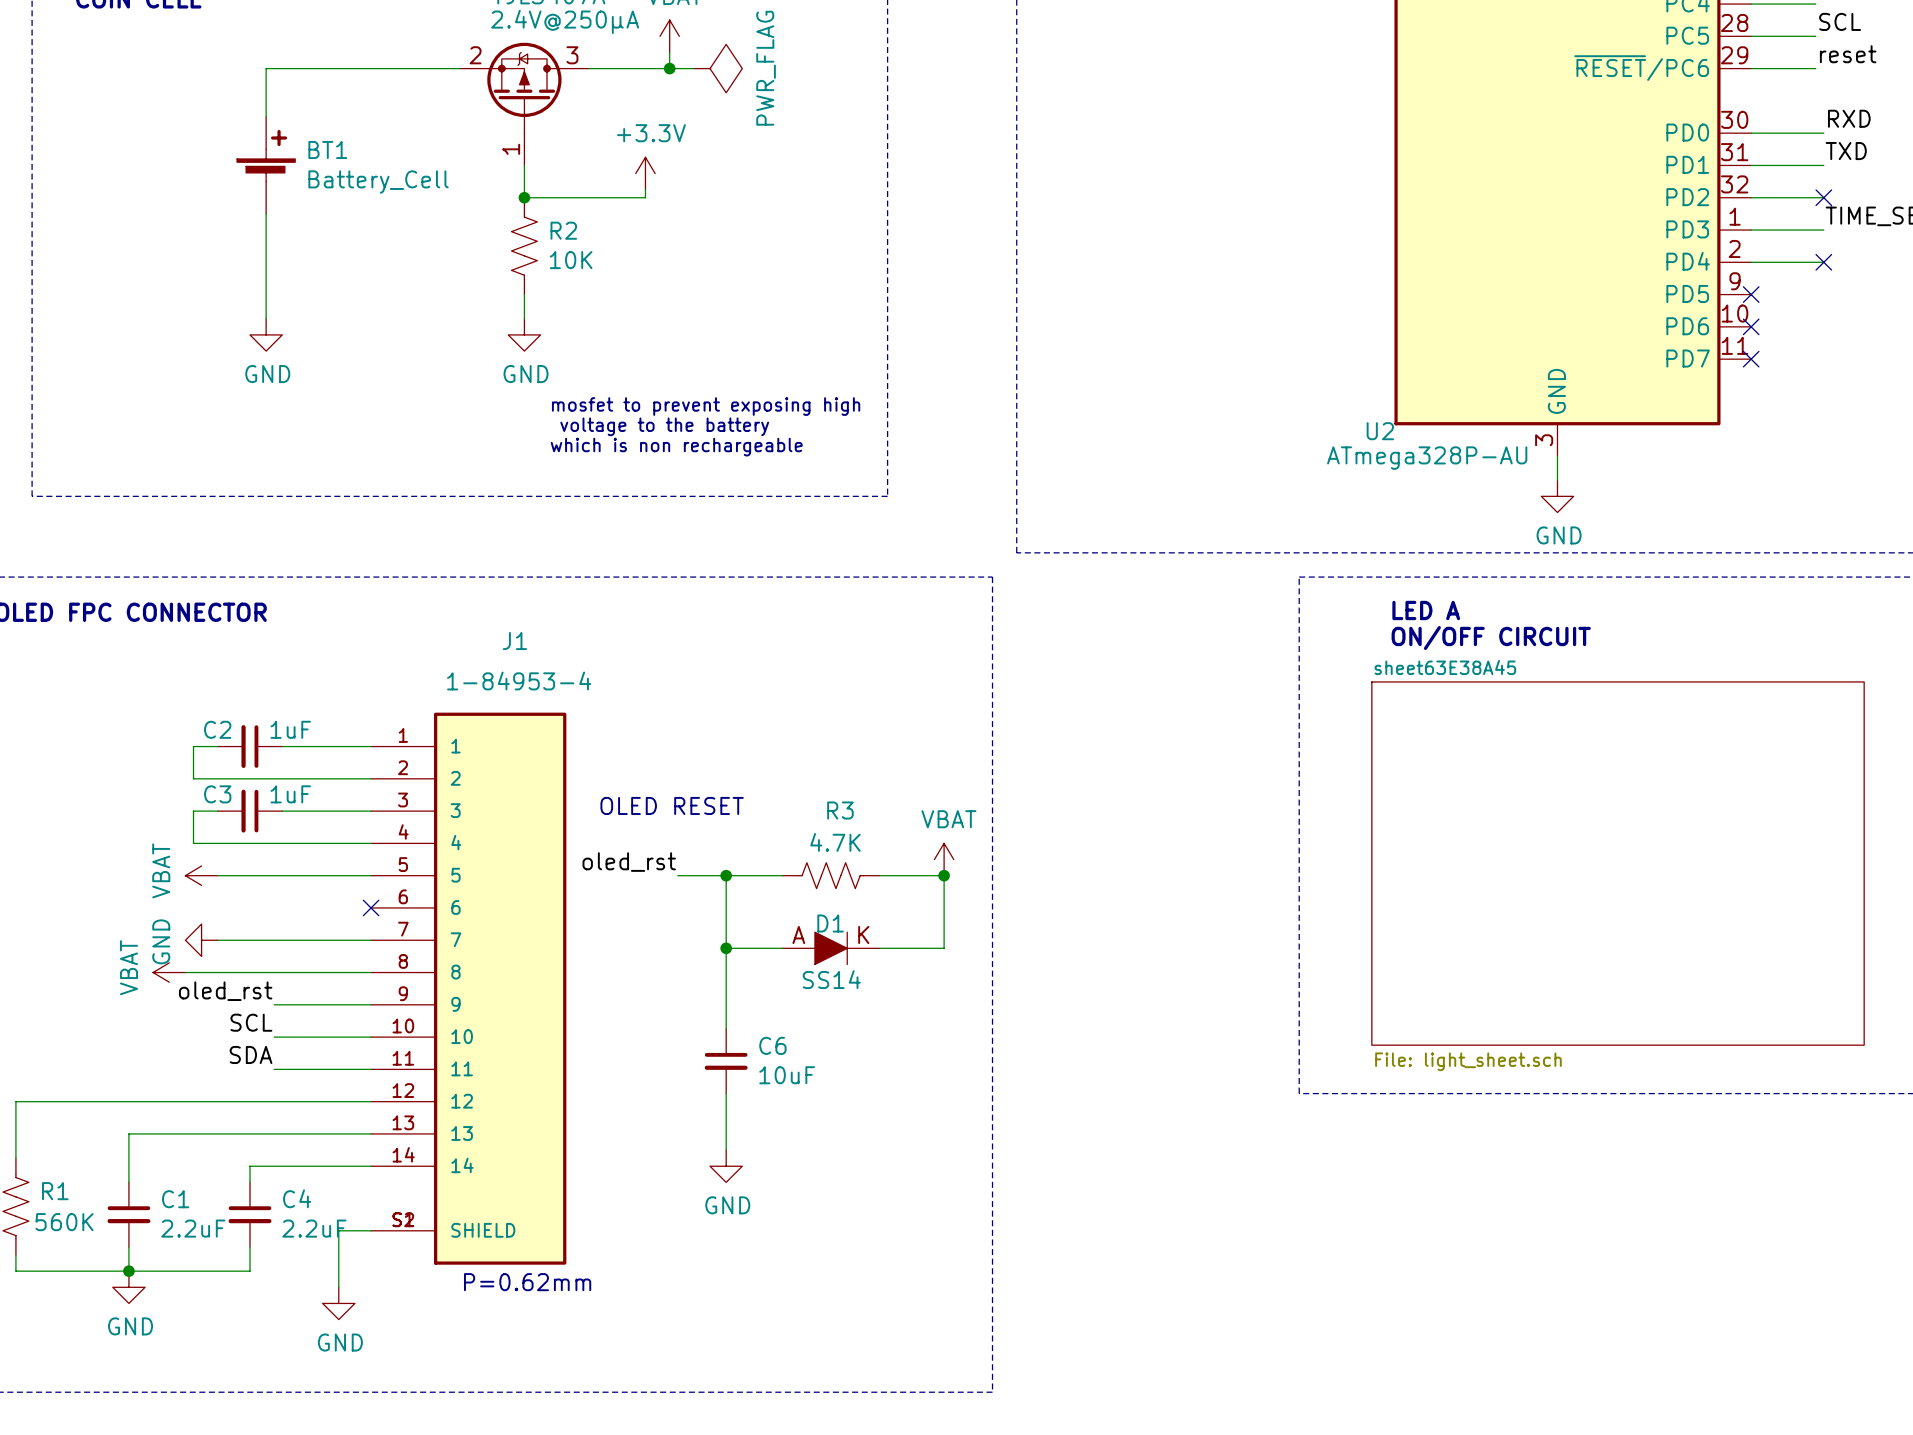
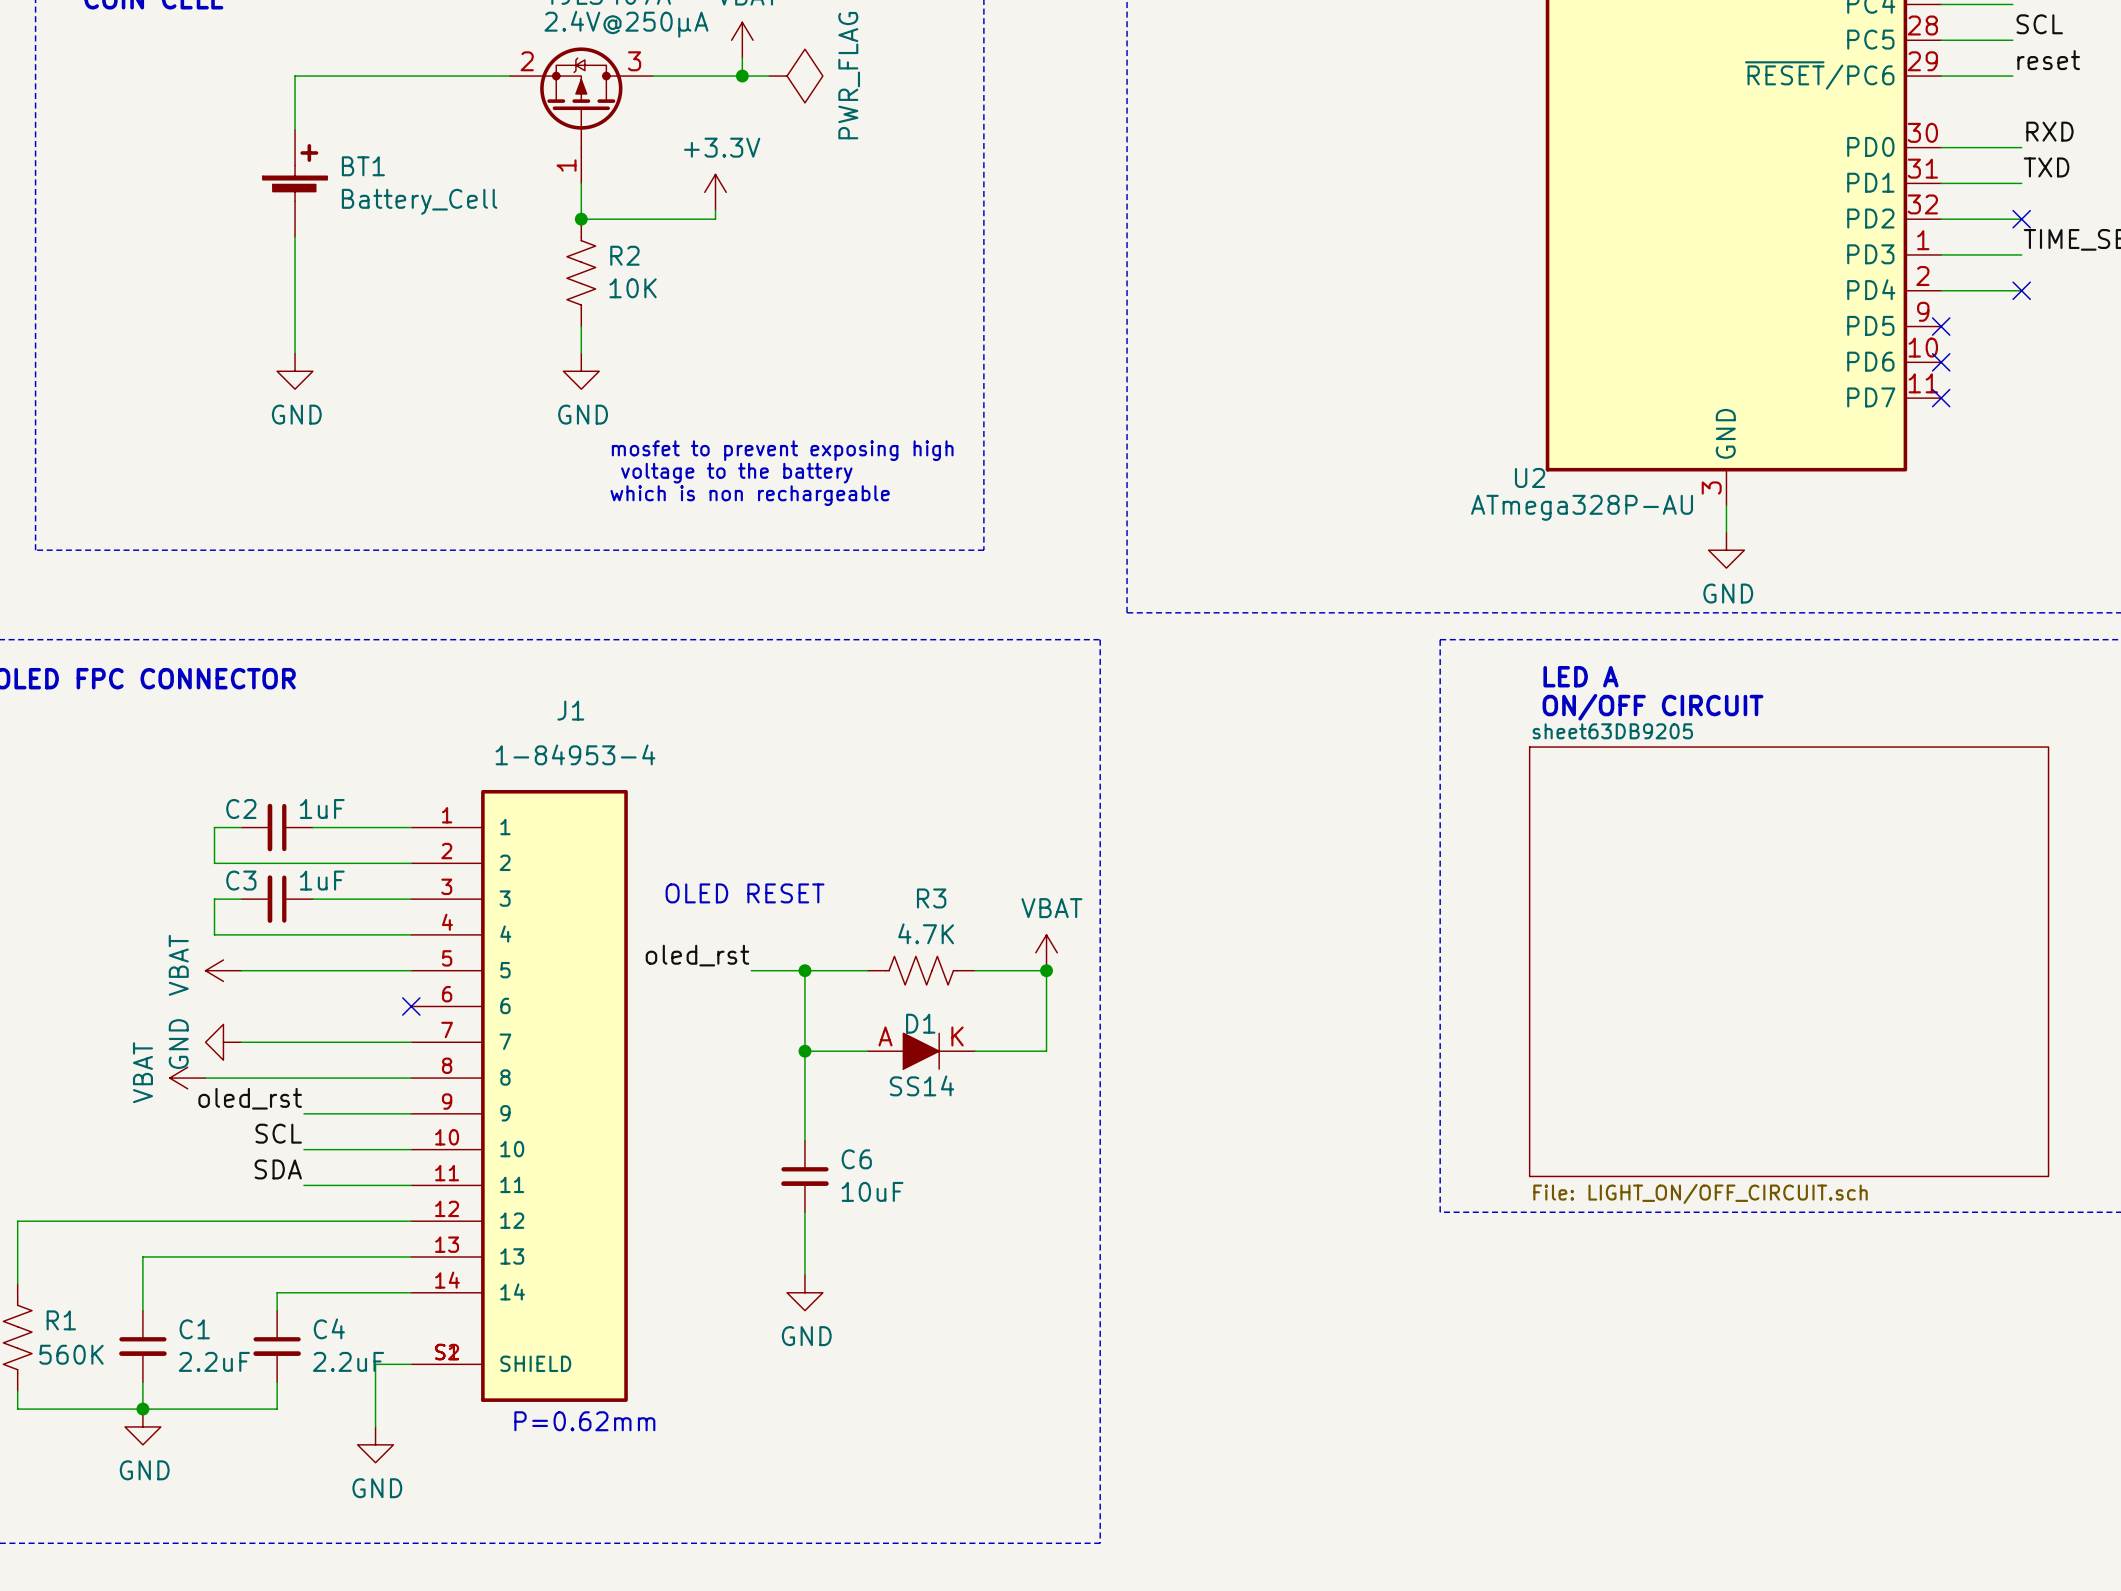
sheet sheet63E38A45: File: light_sheet.sch (1618, 863) -> none
sheet sheet63DB9205: none -> File: LIGHT_ON/OFF_CIRCUIT.sch (1789, 961)

